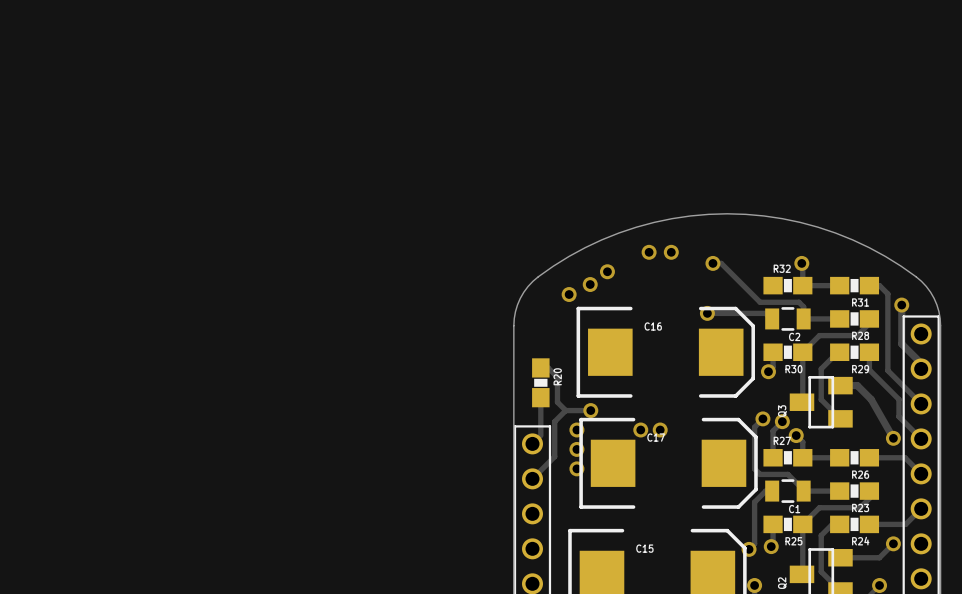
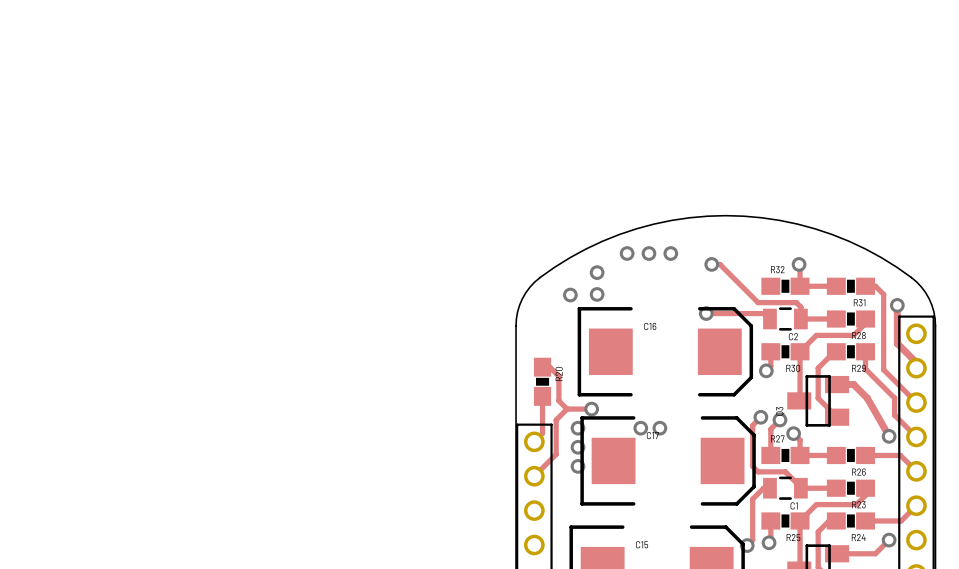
via: none -> (627, 253)
via: none -> (597, 272)
via: (607, 271) -> none
via: (590, 284) -> none
via: none -> (597, 294)

